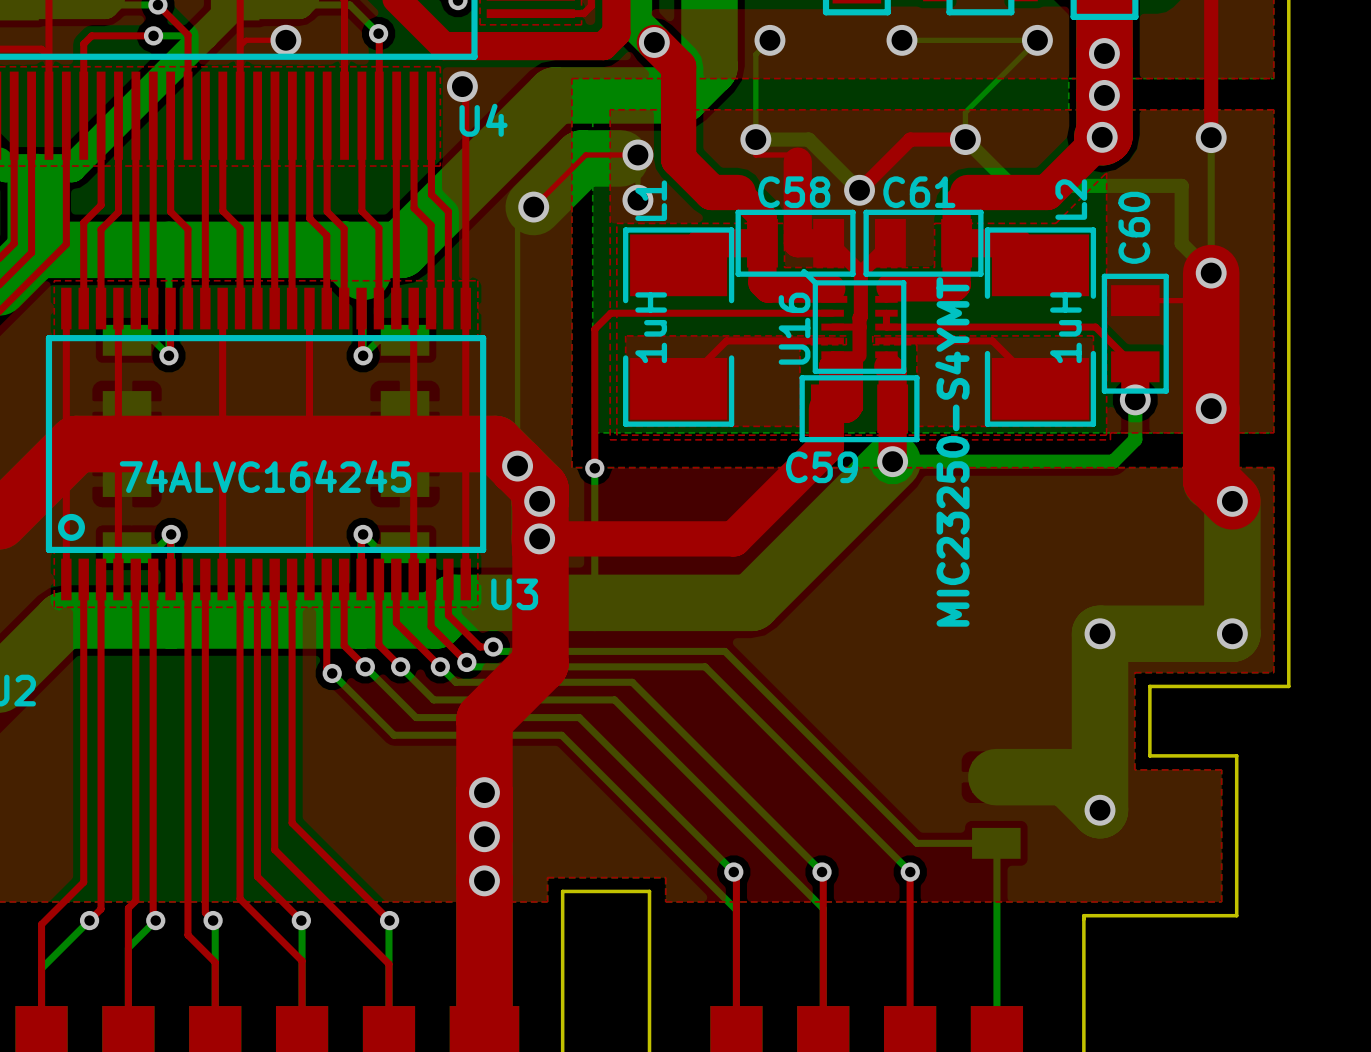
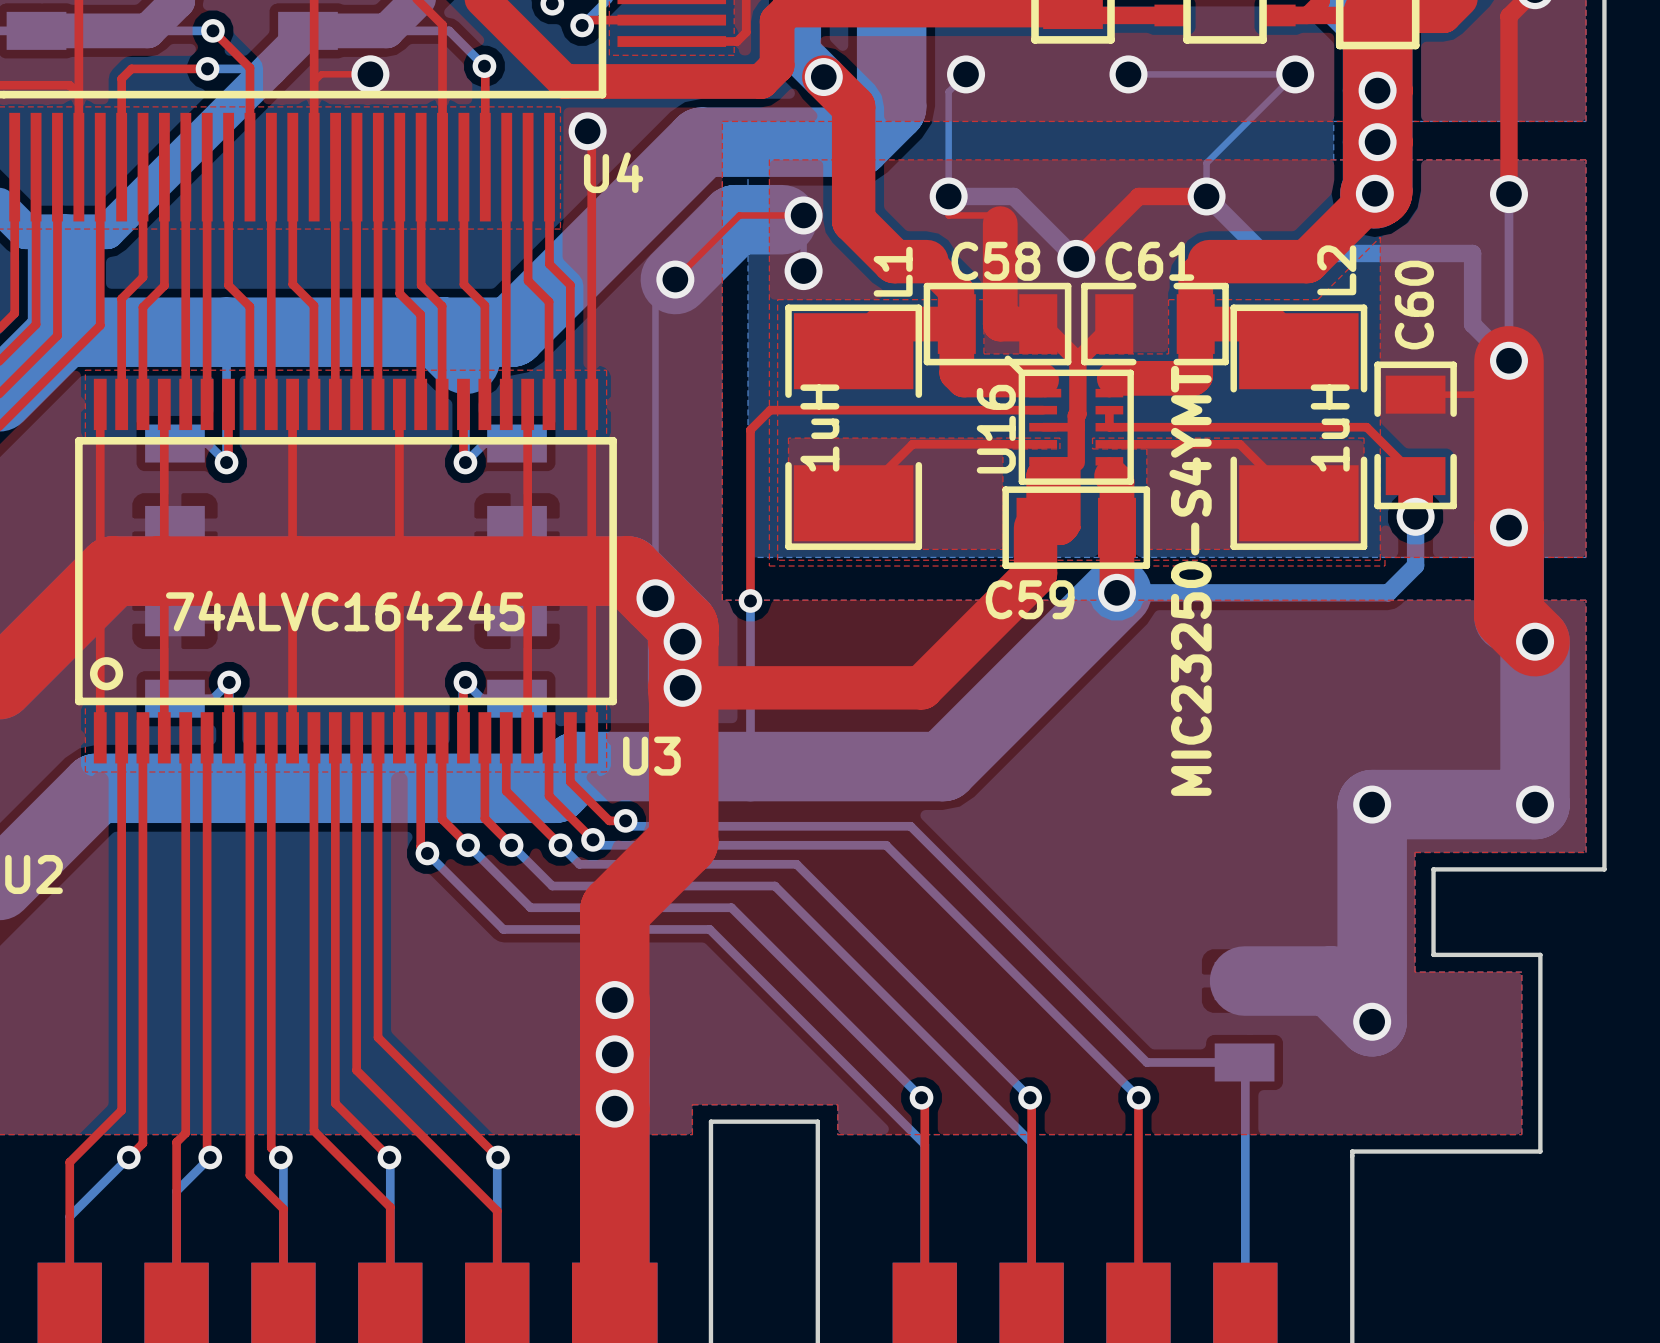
L1 name position: L1 (651, 200) -> L1 (893, 271)
C61 footprint: [863, 209, 984, 277] -> [1081, 282, 1229, 366]
C60 footprint: [1101, 273, 1169, 394] -> [1374, 361, 1457, 510]

